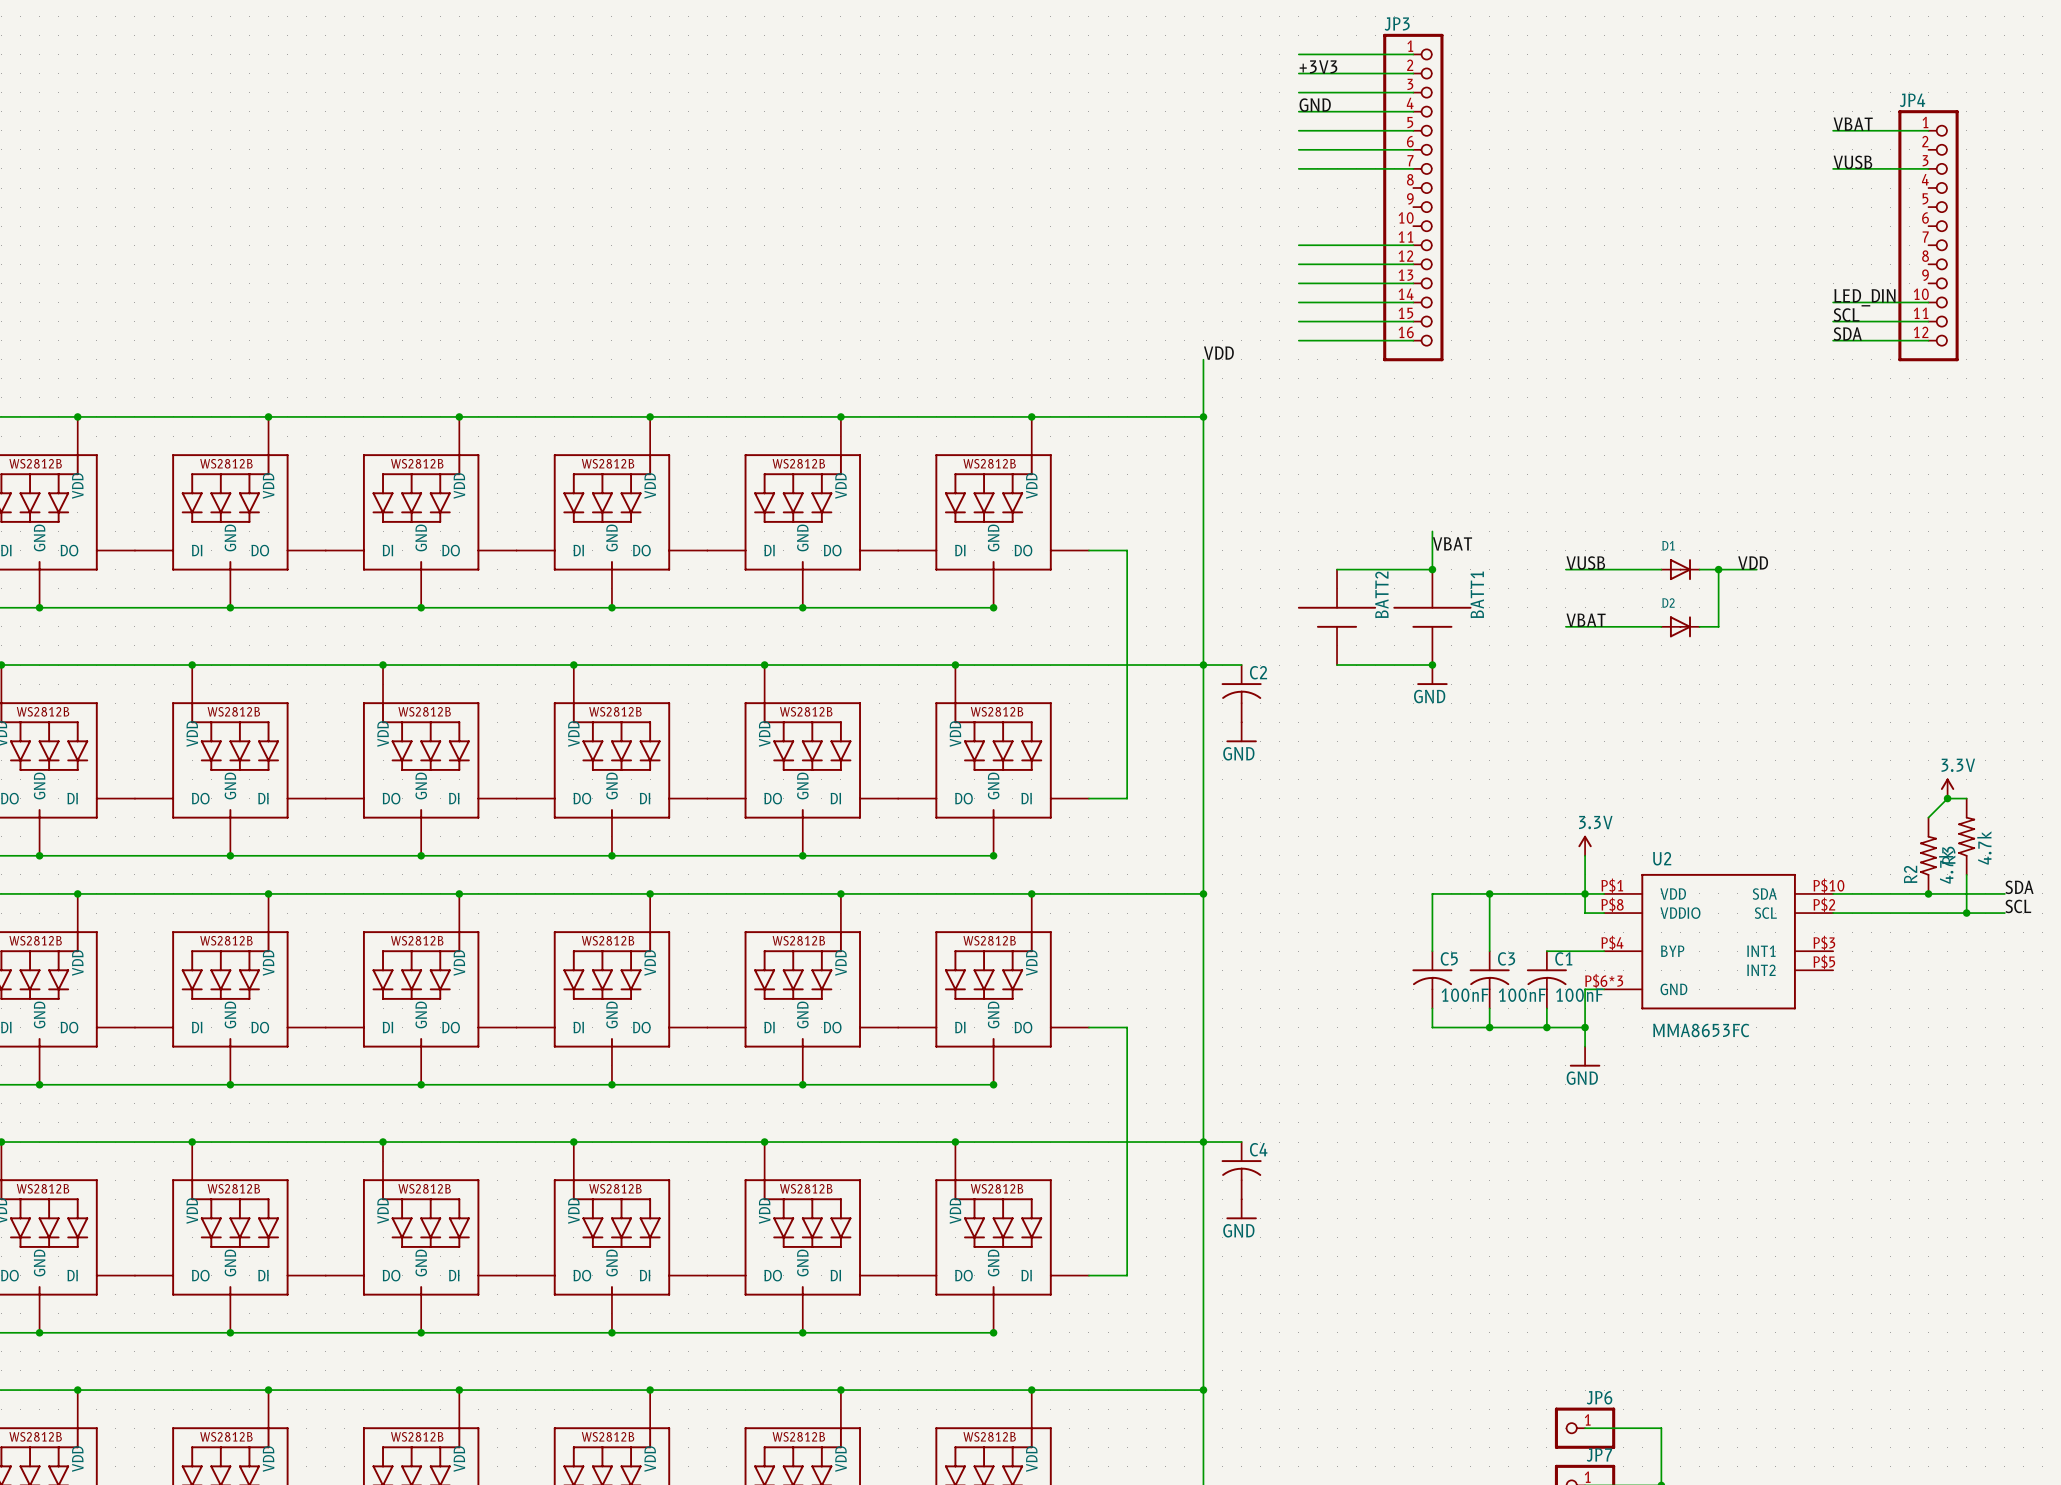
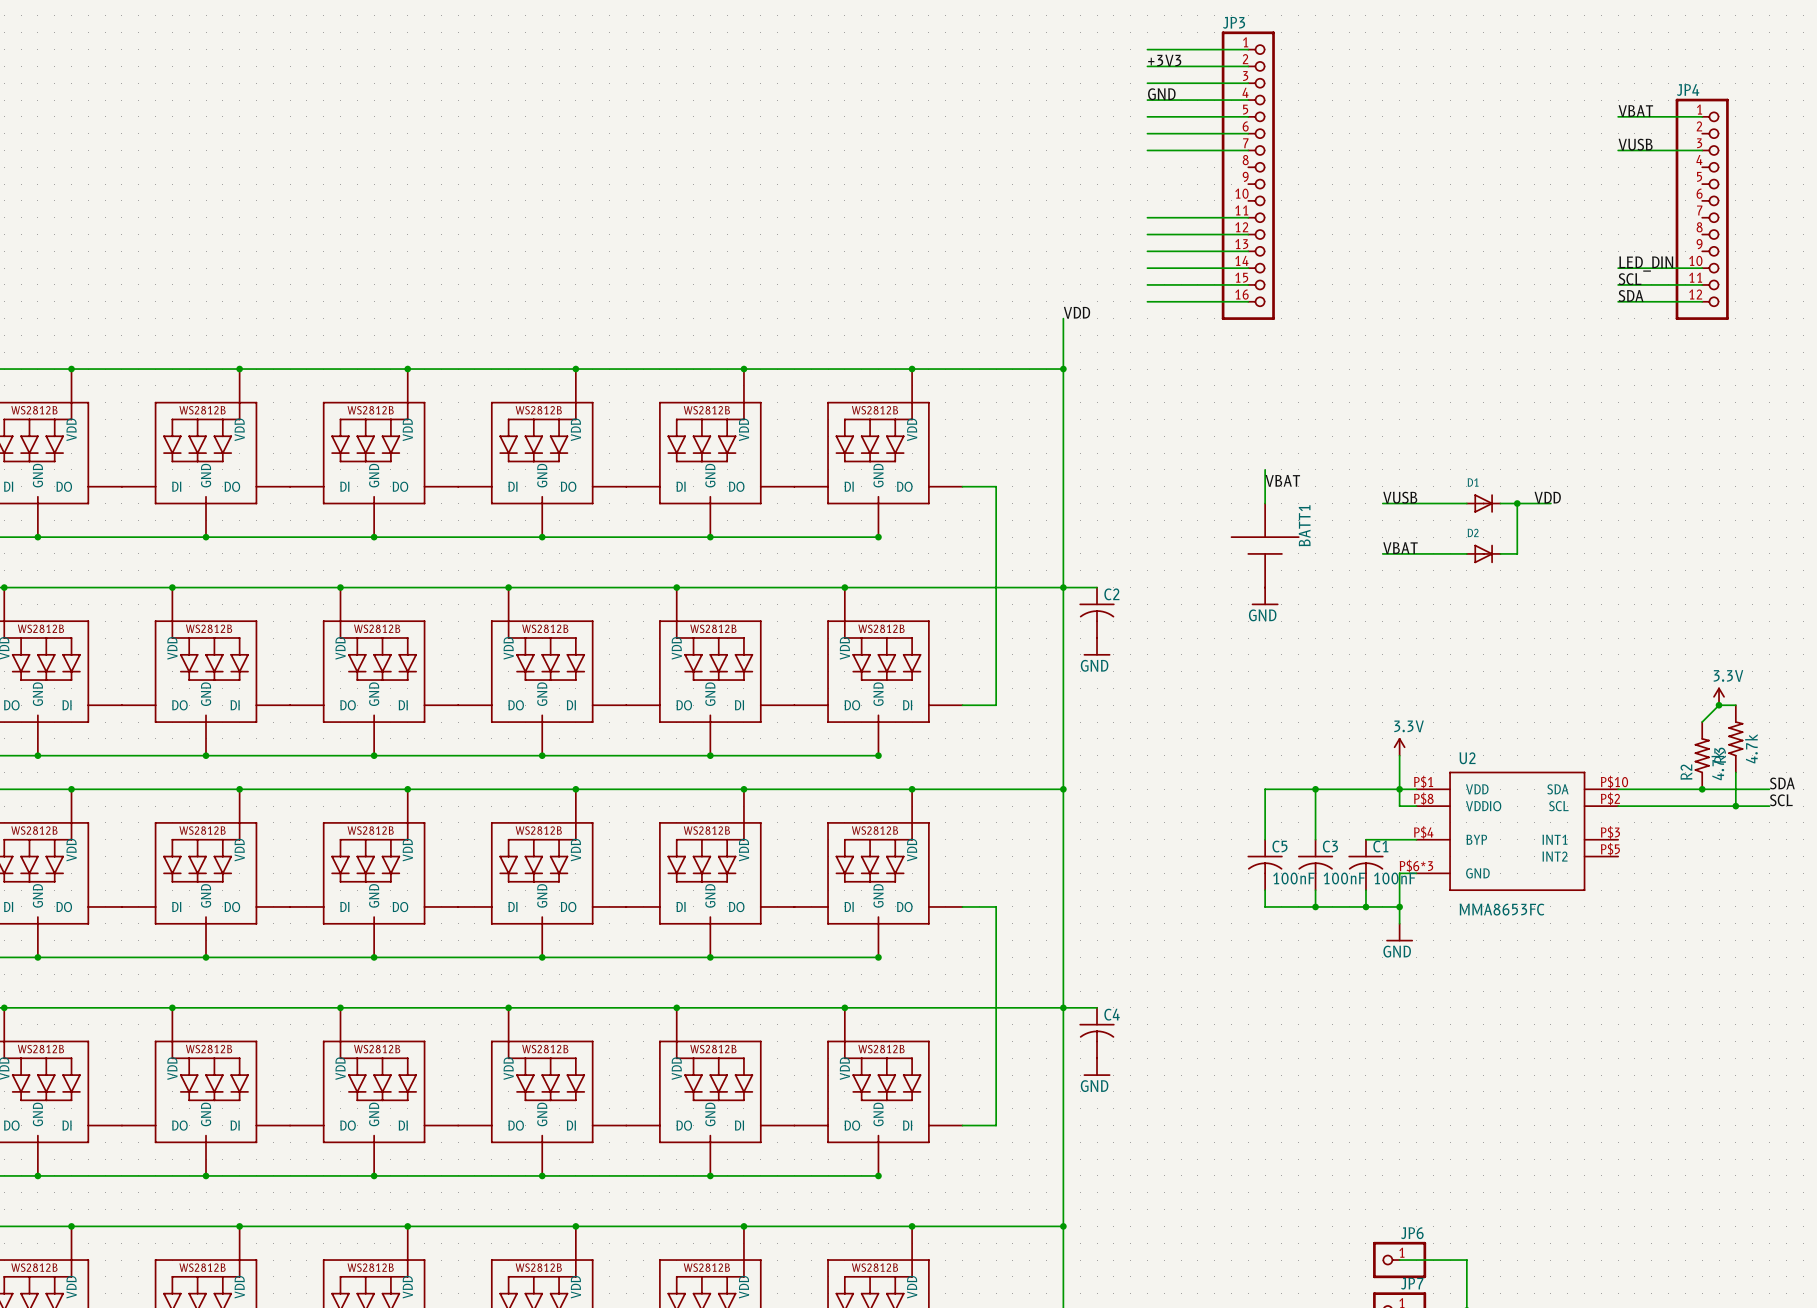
wire: (1337, 569) (1432, 569) -> none
junction: (1432, 569) -> none
BATT2: (1337, 617) -> none
wire: (1337, 665) (1432, 665) -> none
junction: (1432, 665) -> none

